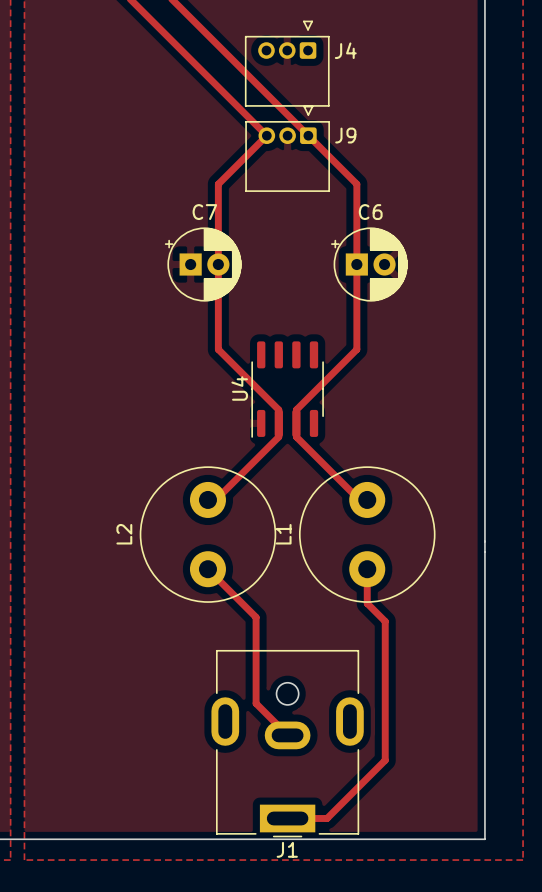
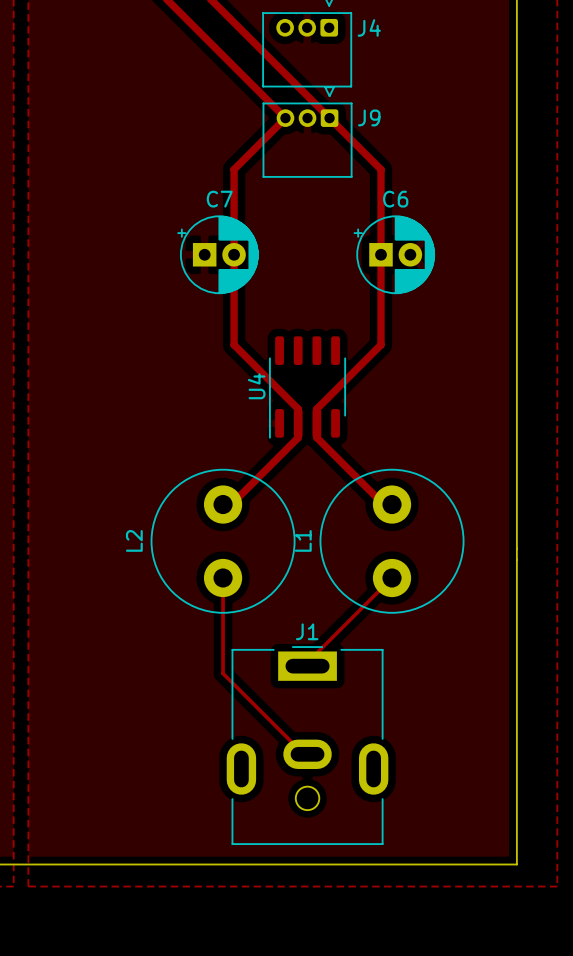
track: (207, 569) (256, 617) (256, 703) (287, 735) -> (223, 578) (223, 673) (303, 754) (307, 754)
track: (367, 569) (367, 603) (385, 621) (385, 760) (327, 818) (287, 818) -> (392, 578) (307, 662) (307, 666)
J1 rotation: 0° (287, 743) -> 180° (307, 745)

